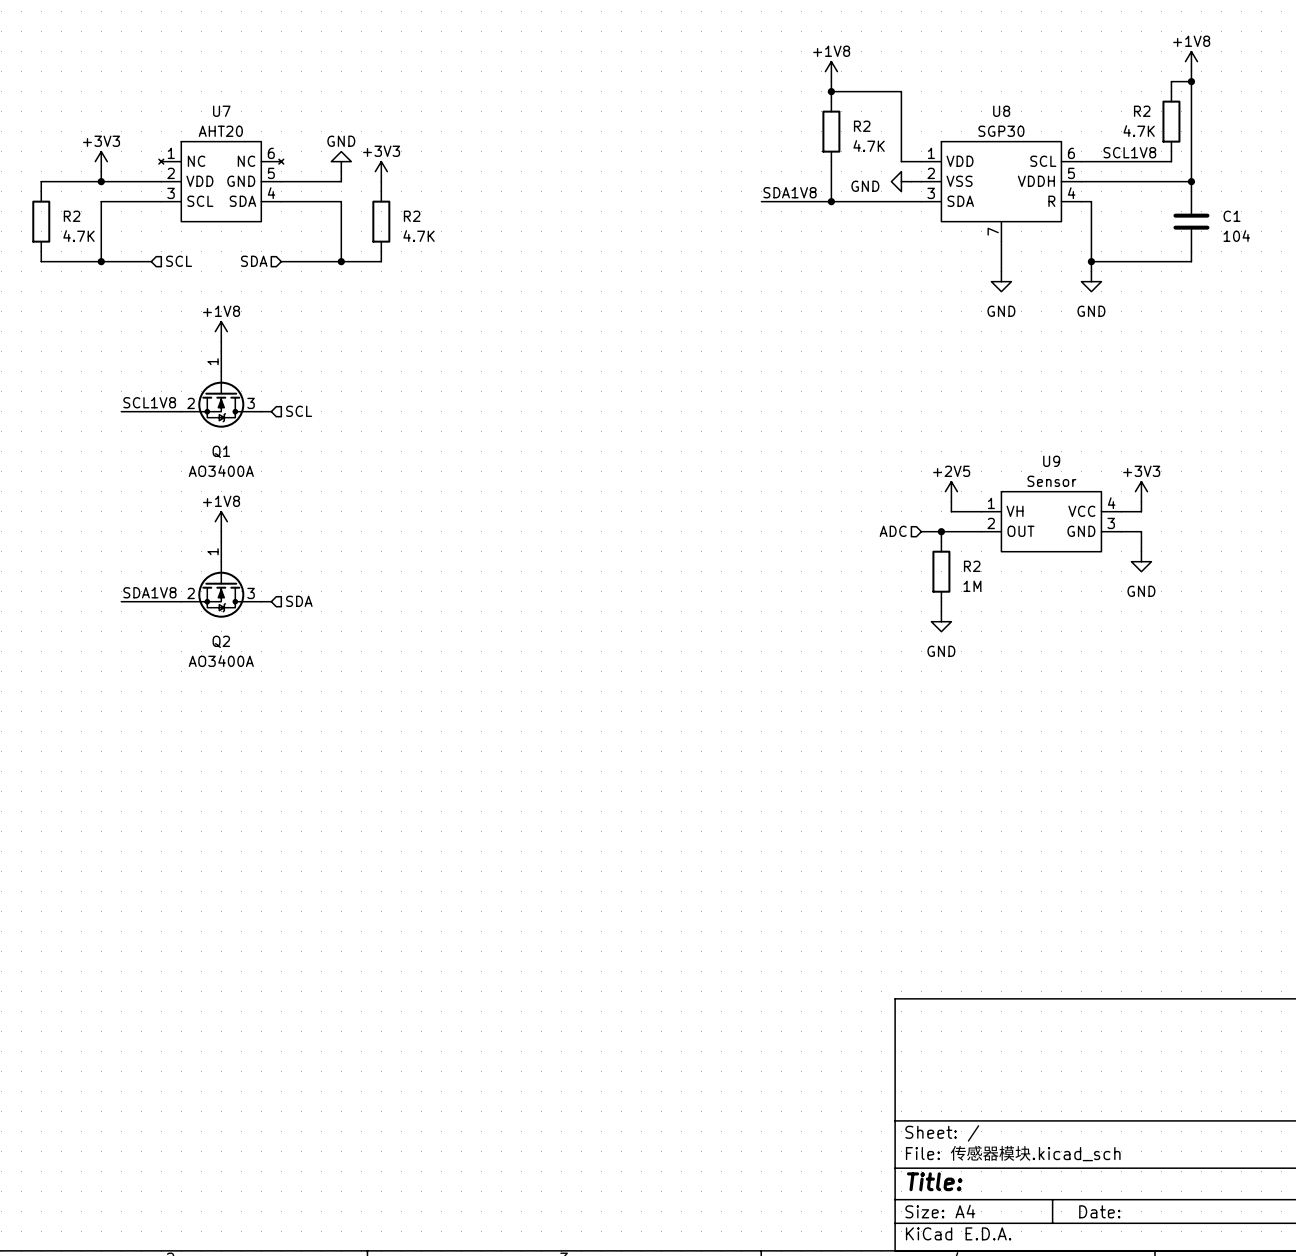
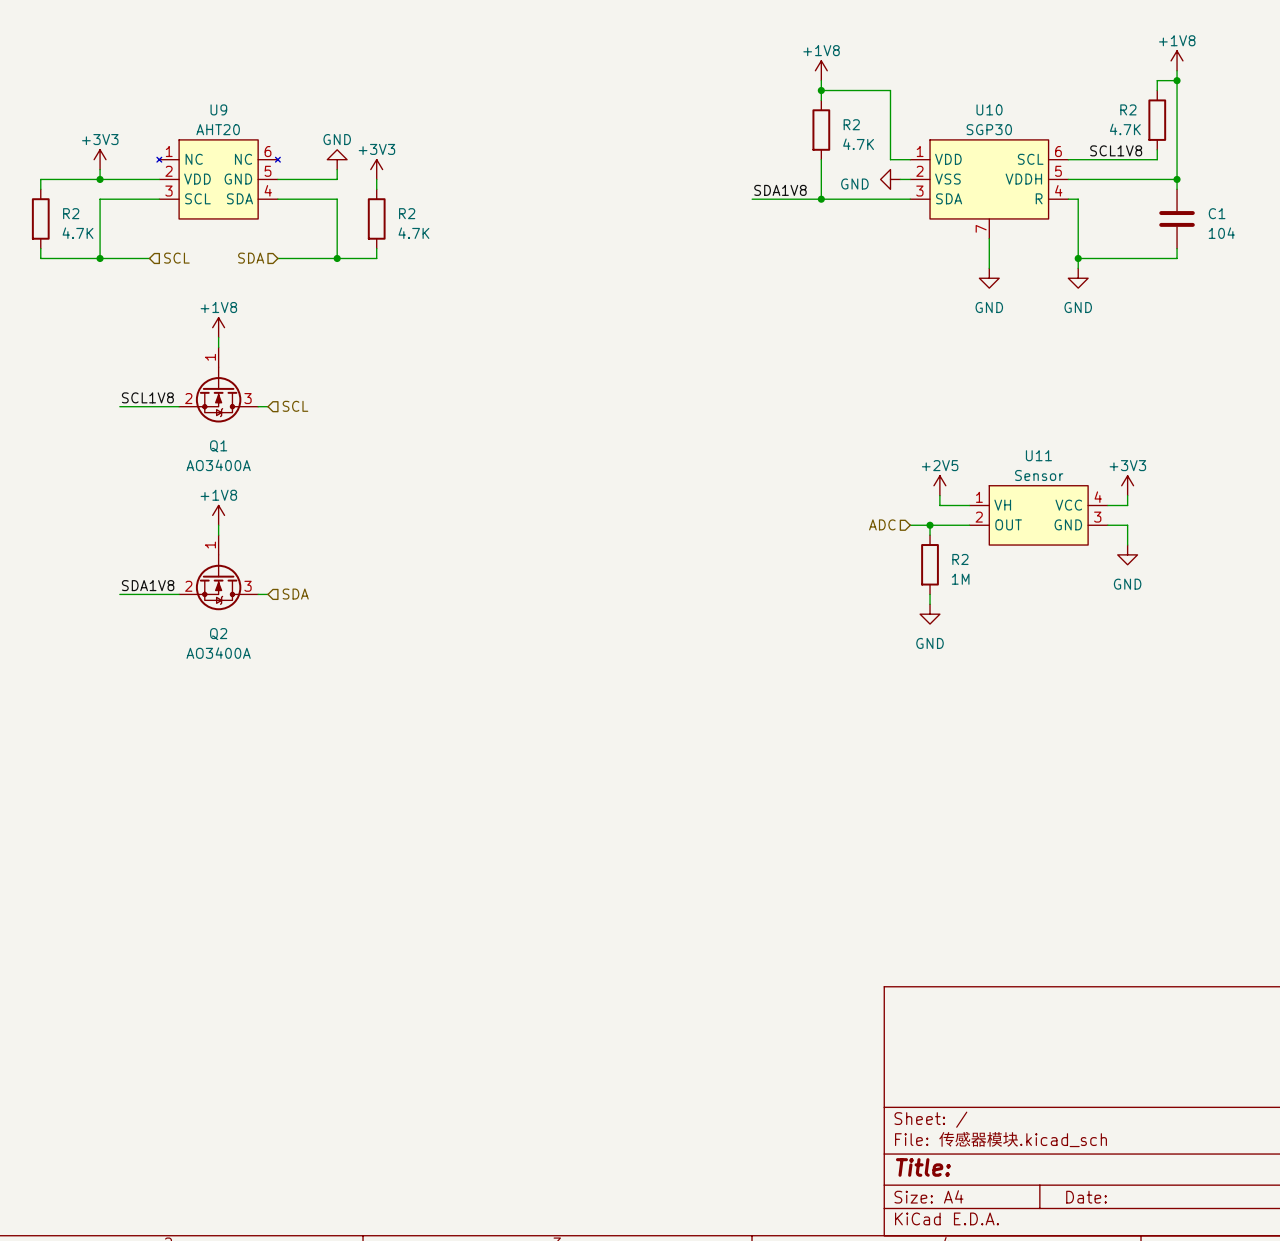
U7 name: U7 (221, 111) -> U9 (218, 109)
U8 name: U8 (1001, 111) -> U10 (989, 109)
U9 name: U9 (1051, 461) -> U11 (1038, 455)

